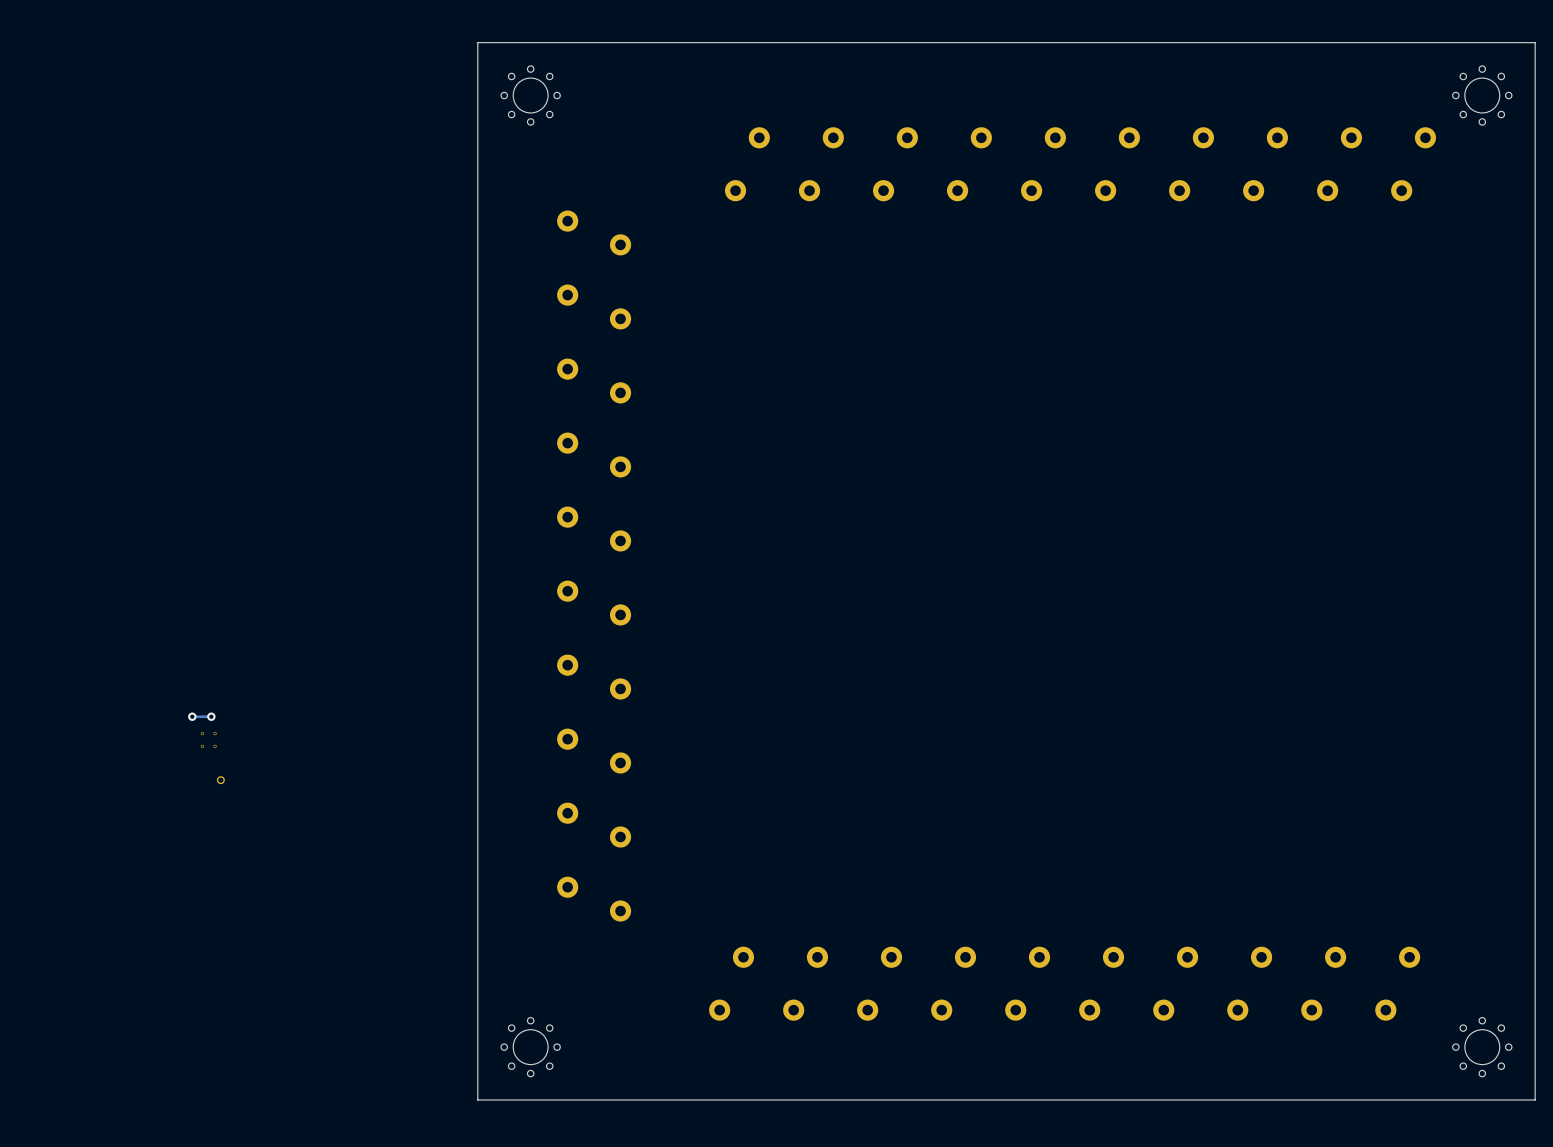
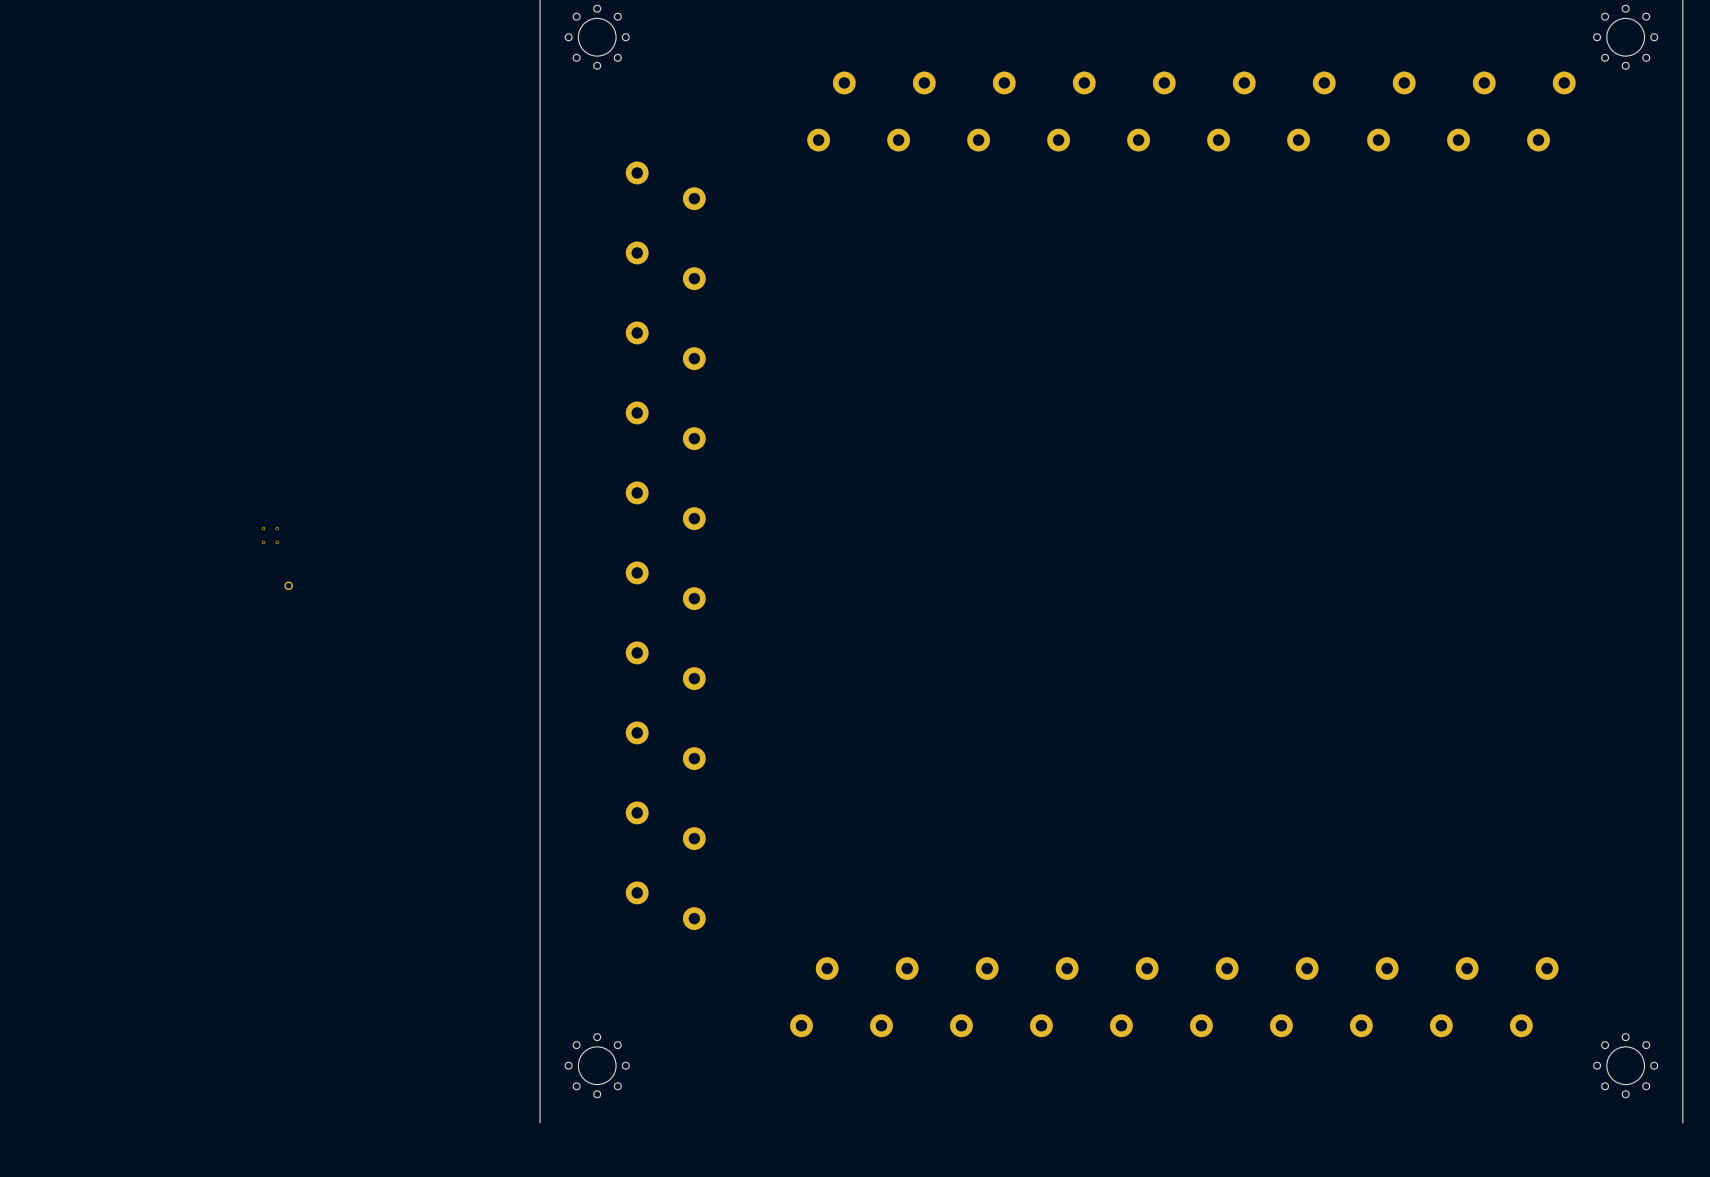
via: (192, 716) -> none
track: (211, 716) (192, 716) -> none
via: (211, 716) -> none
part position: (208, 739) -> (270, 535)
part position: (220, 780) -> (288, 585)
board edge: (1535, 1100) (477, 1100) -> none

